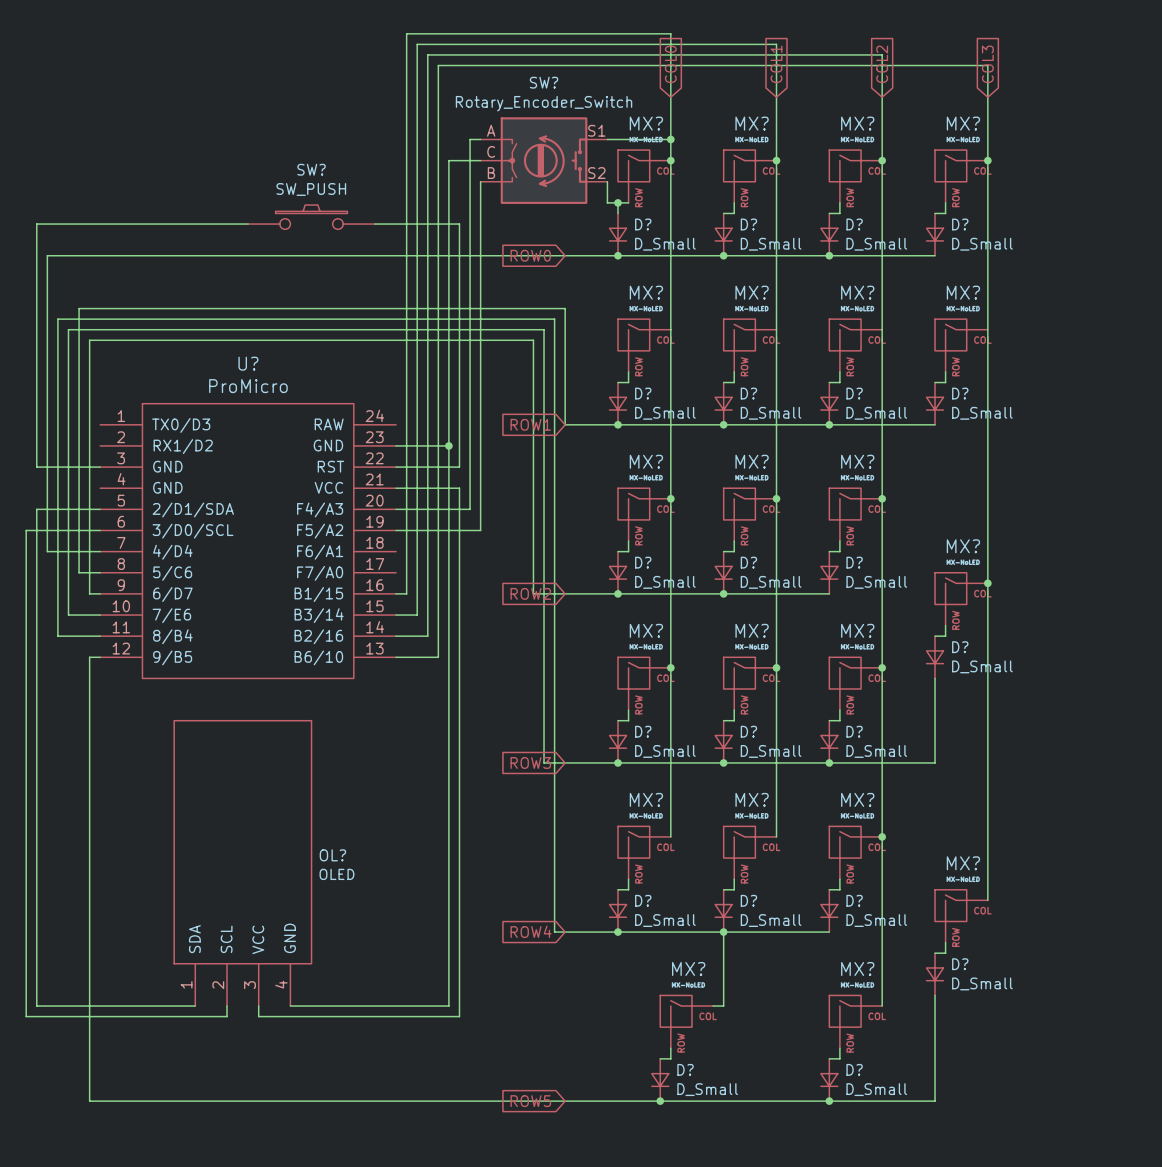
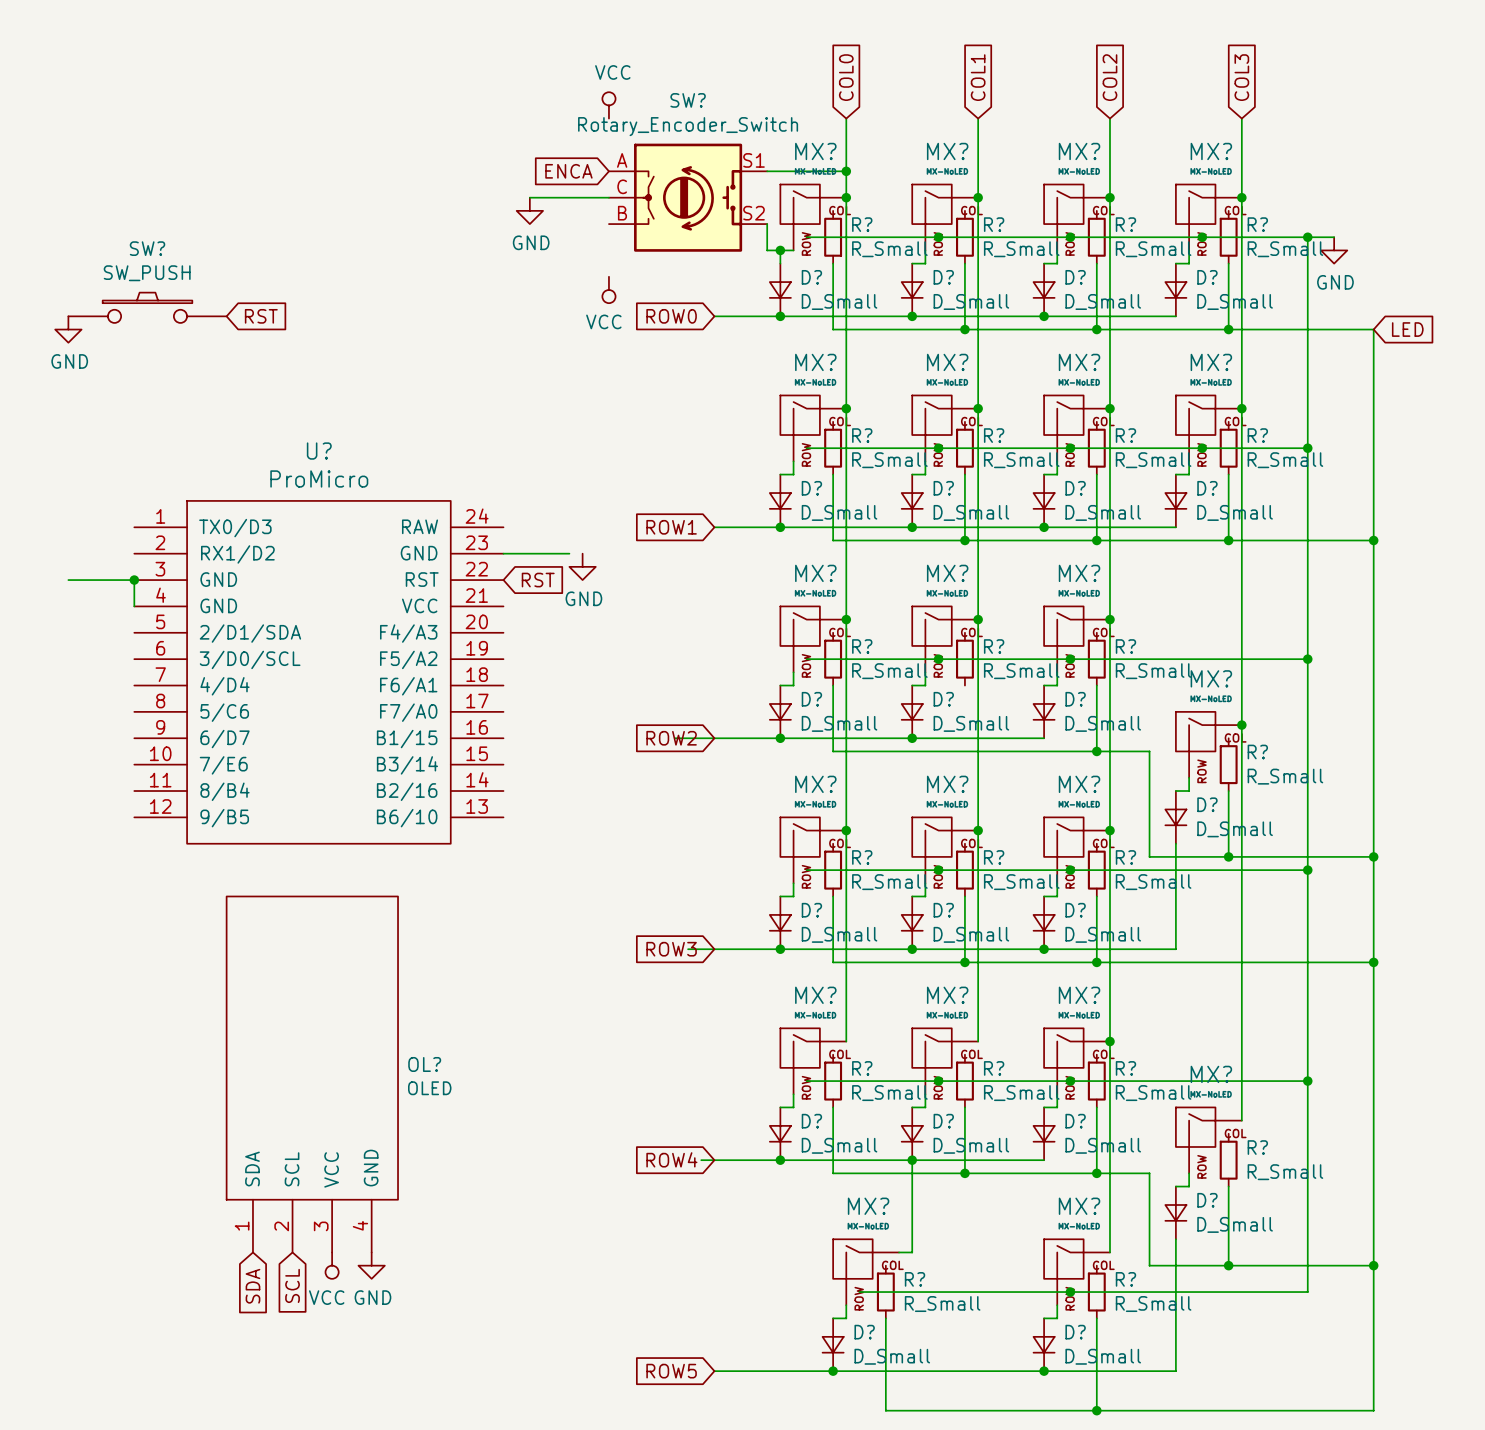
power symbol: none -> VCC (608, 105)
wire: (670, 97) (670, 33) (406, 33) (406, 593) (396, 593) -> none
wire: (776, 97) (776, 44) (417, 44) (417, 615) (396, 615) -> none
wire: (882, 97) (882, 54) (427, 54) (427, 636) (396, 636) -> none
wire: (987, 97) (987, 65) (438, 65) (438, 657) (396, 657) -> none
global label: none -> ENCA (568, 171)
wire: (480, 139) (470, 139) (470, 509) (396, 509) -> none
wire: (448, 160) (448, 1006) (290, 1006) -> (569, 197) (529, 197)
power symbol: none -> GND (529, 210)
wire: (480, 181) (480, 530) (396, 530) -> none
wire: none -> (806, 237) (1334, 237)
R?: none -> R_Small (833, 237)
junction: none -> (938, 237)
R?: none -> R_Small (964, 237)
junction: none -> (1070, 237)
R?: none -> R_Small (1096, 237)
junction: none -> (1202, 237)
R?: none -> R_Small (1228, 237)
wire: none -> (1307, 237) (1307, 1292) (859, 1292)
junction: none -> (1307, 237)
power symbol: none -> GND (1334, 250)
wire: none -> (833, 263) (833, 329) (1373, 329) (1373, 1410) (885, 1410) (885, 1318)
wire: none -> (964, 263) (964, 329)
wire: none -> (1096, 263) (1096, 329)
wire: none -> (1228, 263) (1228, 329)
SW? position: (311, 217) -> (147, 307)
wire: (248, 224) (36, 224) (36, 467) (47, 467) -> none
wire: (374, 224) (459, 224) (459, 467) (396, 467) -> none
power symbol: none -> VCC (608, 289)
global label: none -> RST (261, 316)
wire: (565, 255) (47, 255) (47, 551) (100, 551) -> none
power symbol: none -> GND (68, 329)
junction: none -> (964, 329)
junction: none -> (1096, 329)
junction: none -> (1228, 329)
global label: none -> LED (1407, 329)
junction: none -> (846, 408)
junction: none -> (978, 408)
junction: none -> (1109, 408)
junction: none -> (1241, 408)
wire: none -> (806, 448) (1307, 448)
R?: none -> R_Small (833, 448)
junction: none -> (938, 448)
R?: none -> R_Small (964, 448)
junction: none -> (1070, 448)
R?: none -> R_Small (1096, 448)
junction: none -> (1202, 448)
R?: none -> R_Small (1228, 448)
junction: none -> (1307, 448)
wire: none -> (833, 474) (833, 540) (1373, 540)
wire: none -> (964, 474) (964, 540)
wire: none -> (1096, 474) (1096, 540)
wire: none -> (1228, 474) (1228, 540)
wire: (565, 424) (565, 308) (79, 308) (79, 572) (100, 572) -> none
junction: none -> (964, 540)
junction: none -> (1096, 540)
junction: none -> (1228, 540)
junction: none -> (1373, 540)
junction: (448, 445) -> none
power symbol: none -> GND (582, 566)
wire: none -> (134, 580) (134, 606)
junction: none -> (134, 580)
global label: none -> RST (538, 580)
wire: (396, 488) (459, 488) (459, 1016) (258, 1016) (258, 1006) -> none
wire: (100, 509) (36, 509) (36, 1006) (195, 1006) -> none
wire: (100, 530) (26, 530) (26, 1016) (227, 1016) (227, 1006) -> none
wire: none -> (806, 659) (1307, 659)
R?: none -> R_Small (833, 659)
junction: none -> (938, 659)
R?: none -> R_Small (964, 659)
junction: none -> (1070, 659)
R?: none -> R_Small (1096, 659)
junction: none -> (1307, 659)
wire: none -> (833, 685) (833, 751) (1149, 751) (1149, 856) (1373, 856)
wire: none -> (1096, 685) (1096, 751)
wire: (100, 593) (89, 593) (89, 340) (533, 340) (533, 593) -> none
junction: none -> (1096, 751)
wire: (100, 615) (68, 615) (68, 329) (544, 329) (544, 762) -> none
R?: none -> R_Small (1228, 764)
wire: (100, 636) (57, 636) (57, 319) (554, 319) (554, 932) -> none
wire: none -> (1228, 791) (1228, 856)
wire: (100, 657) (89, 657) (89, 1101) (565, 1101) -> none
junction: none -> (1228, 856)
junction: none -> (1373, 856)
wire: none -> (806, 870) (1307, 870)
R?: none -> R_Small (833, 870)
junction: none -> (938, 870)
R?: none -> R_Small (964, 870)
junction: none -> (1070, 870)
R?: none -> R_Small (1096, 870)
junction: none -> (1307, 870)
wire: none -> (833, 896) (833, 962) (1373, 962)
wire: none -> (964, 896) (964, 962)
wire: none -> (1096, 896) (1096, 962)
junction: none -> (964, 962)
junction: none -> (1096, 962)
junction: none -> (1373, 962)
wire: none -> (806, 1081) (1307, 1081)
R?: none -> R_Small (833, 1081)
junction: none -> (938, 1081)
R?: none -> R_Small (964, 1081)
junction: none -> (1070, 1081)
R?: none -> R_Small (1096, 1081)
junction: none -> (1307, 1081)
wire: none -> (833, 1107) (833, 1173) (1149, 1173) (1149, 1265) (1373, 1265)
wire: none -> (964, 1107) (964, 1173)
wire: none -> (1096, 1107) (1096, 1173)
R?: none -> R_Small (1228, 1160)
junction: none -> (964, 1173)
junction: none -> (1096, 1173)
wire: none -> (1228, 1186) (1228, 1265)
power symbol: none -> VCC (332, 1265)
power symbol: none -> GND (371, 1265)
junction: none -> (1228, 1265)
junction: none -> (1373, 1265)
global label: none -> SCL (292, 1285)
global label: none -> SDA (252, 1286)
R?: none -> R_Small (885, 1292)
junction: none -> (1070, 1292)
R?: none -> R_Small (1096, 1292)
wire: none -> (1096, 1318) (1096, 1410)
junction: none -> (1096, 1410)

